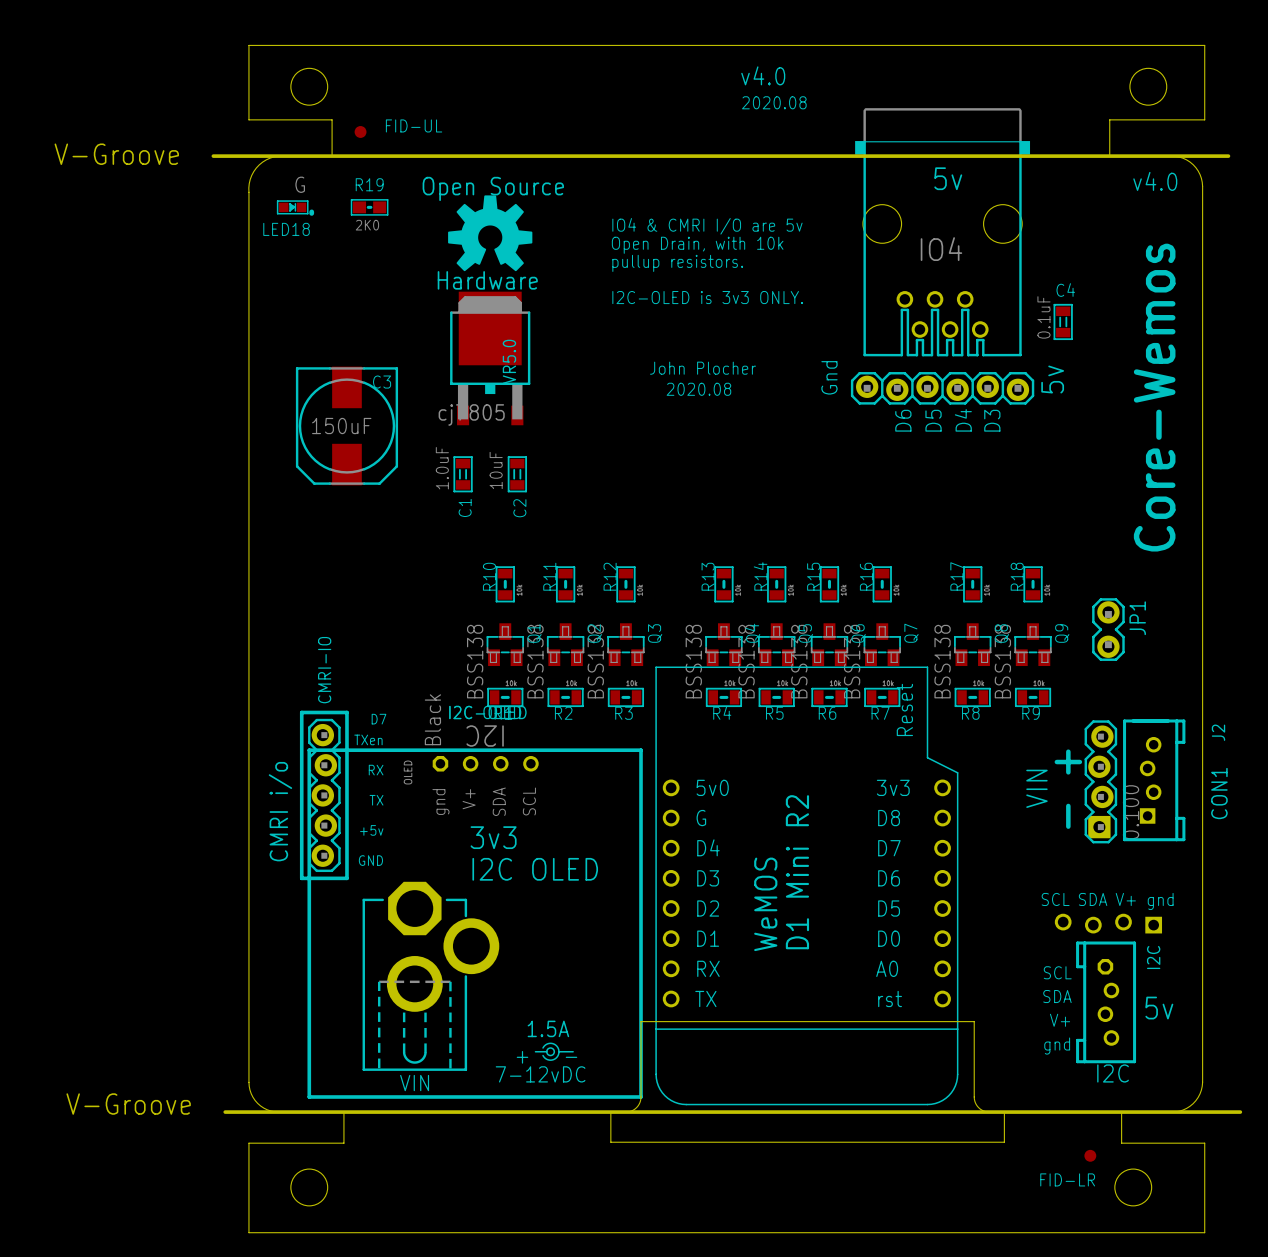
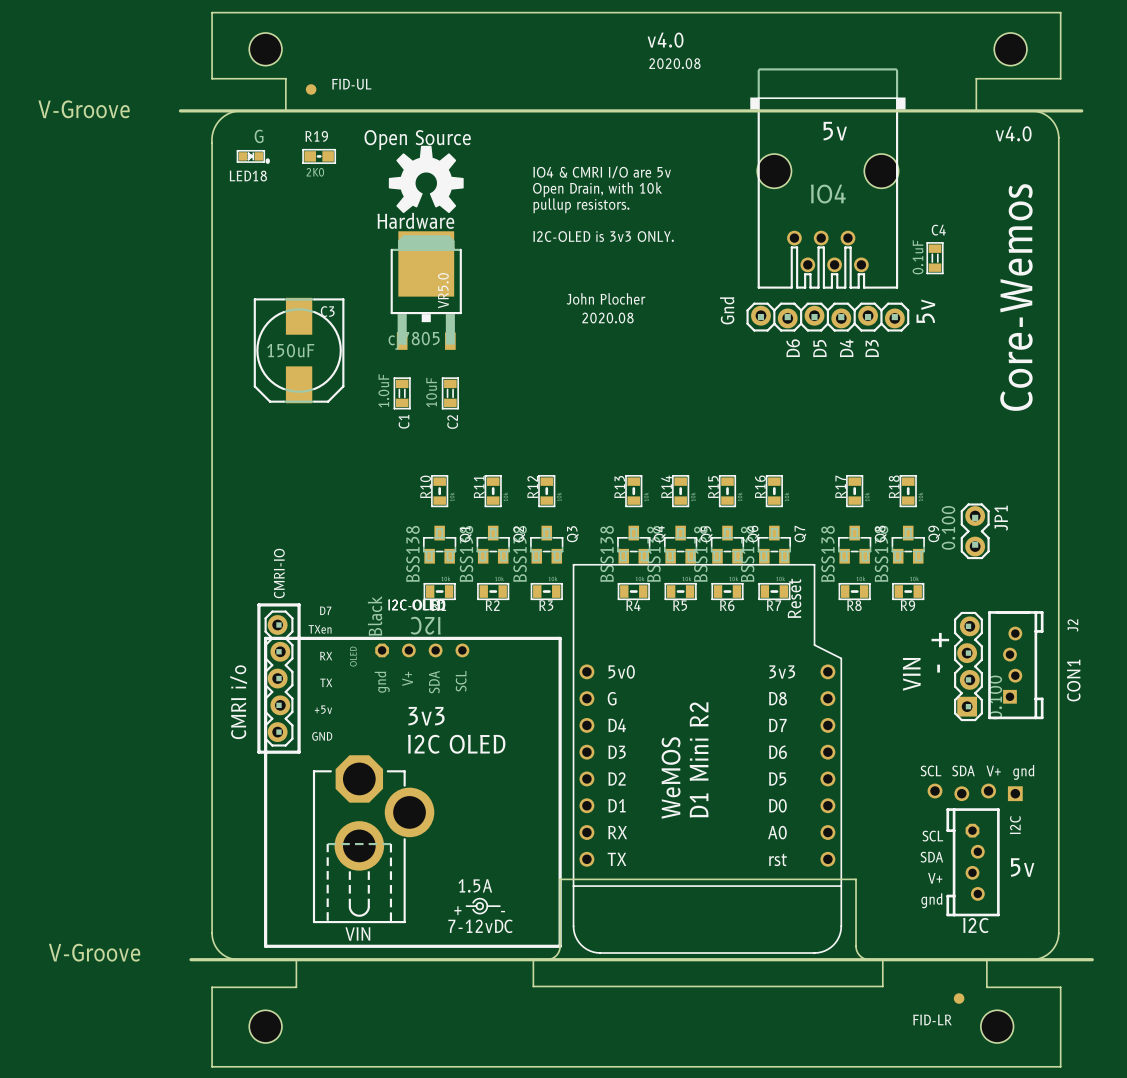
JP1 value: none -> 0.100 (948, 527)

